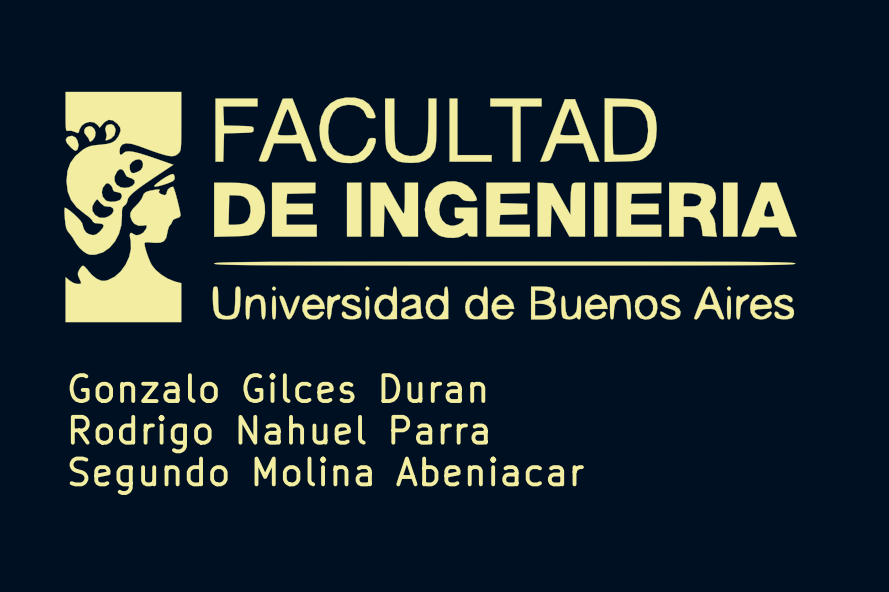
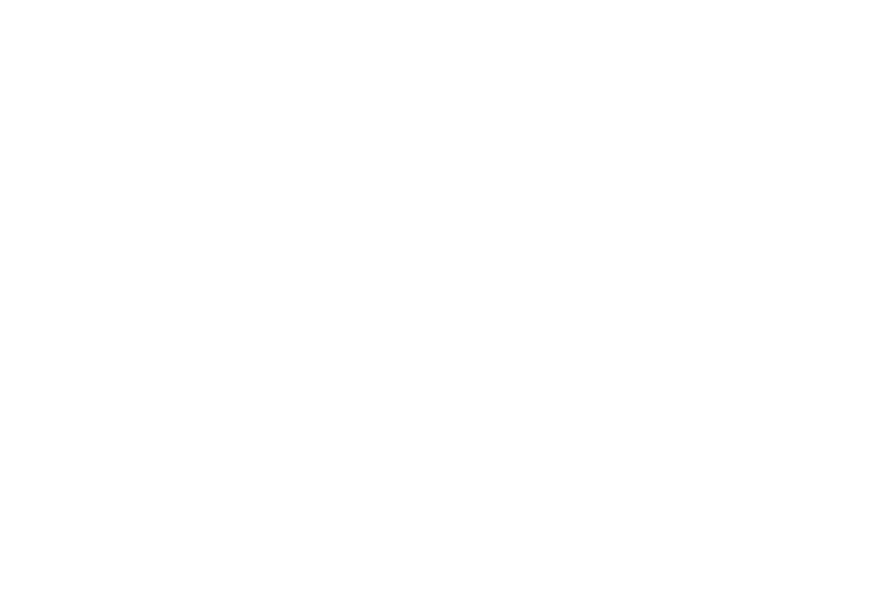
drawing: [64, 91, 797, 323] -> none
text: Gonzalo Gilces Duran (277, 388) -> none
text: Rodrigo Nahuel Parra (279, 434) -> none
text: Segundo Molina Abeniacar (326, 475) -> none

